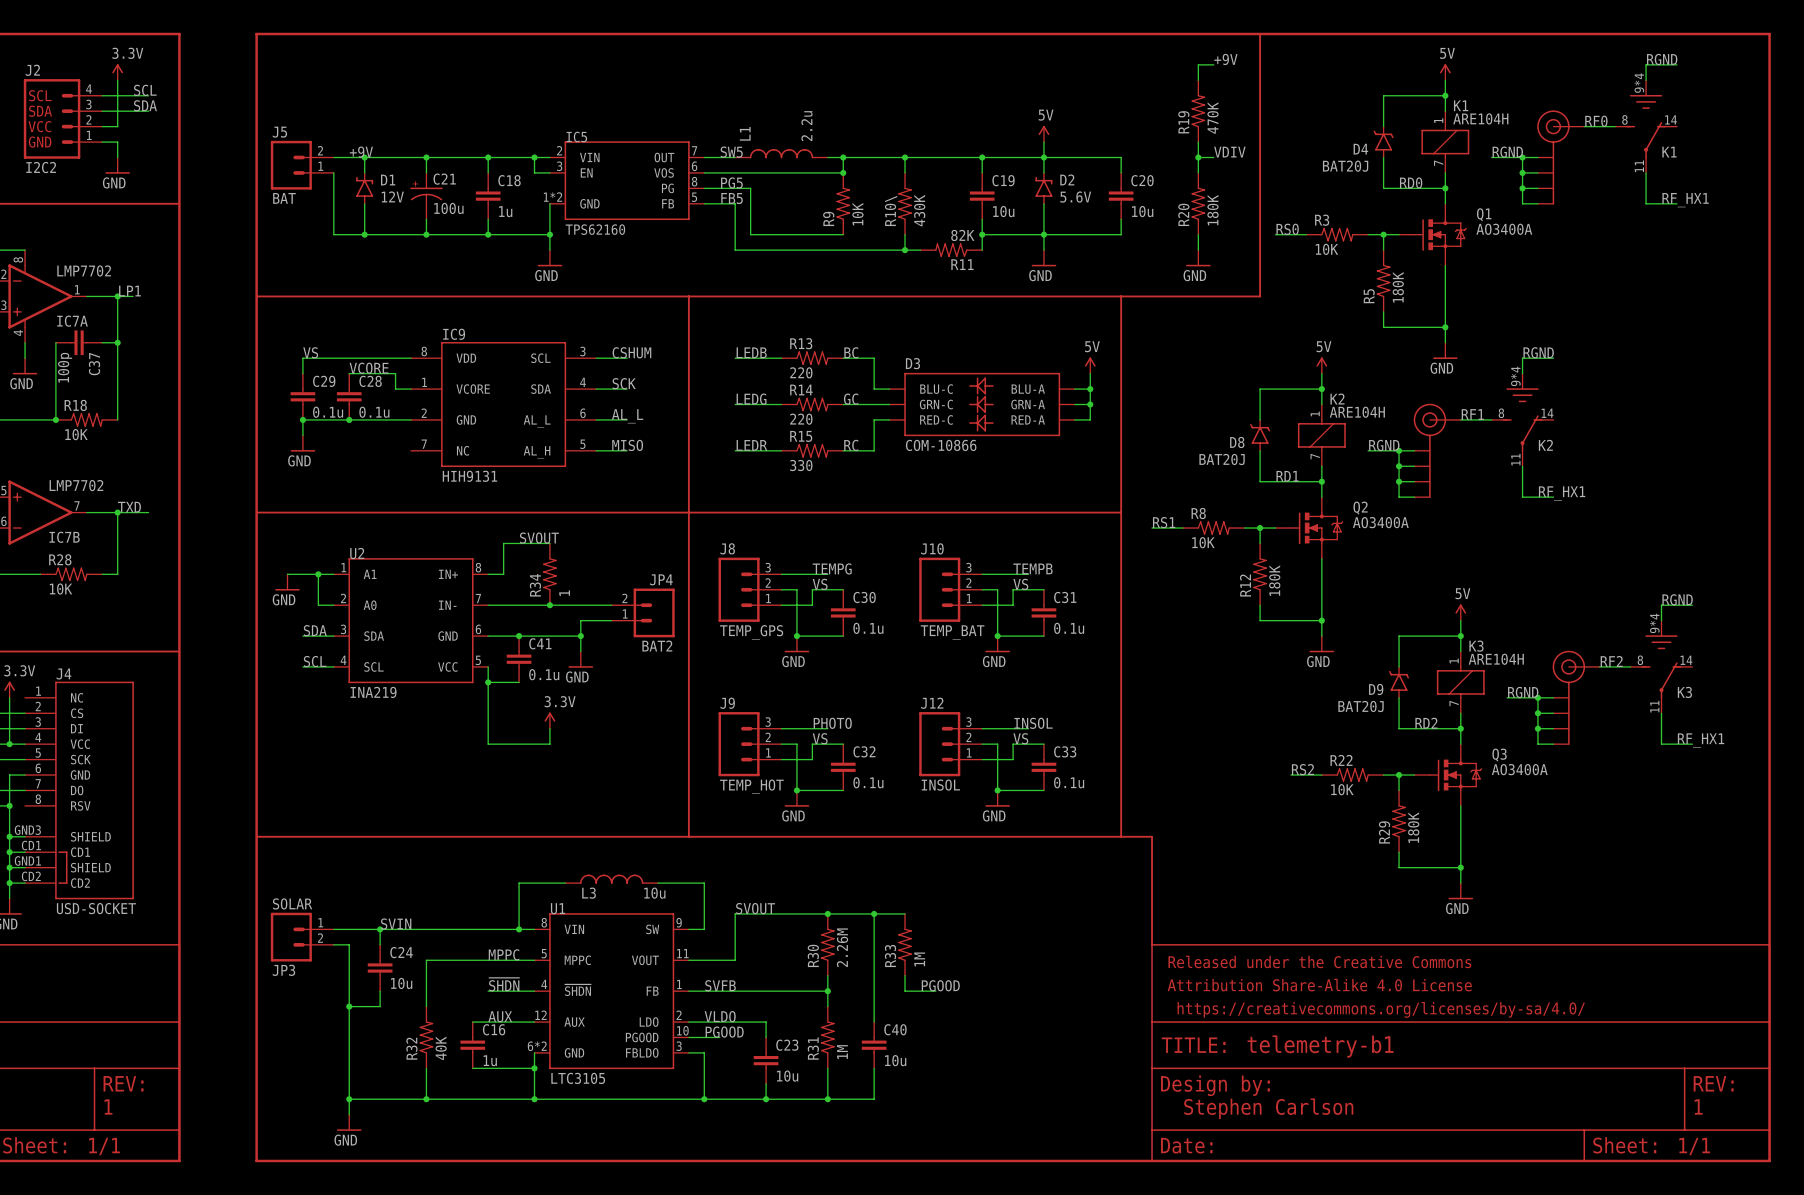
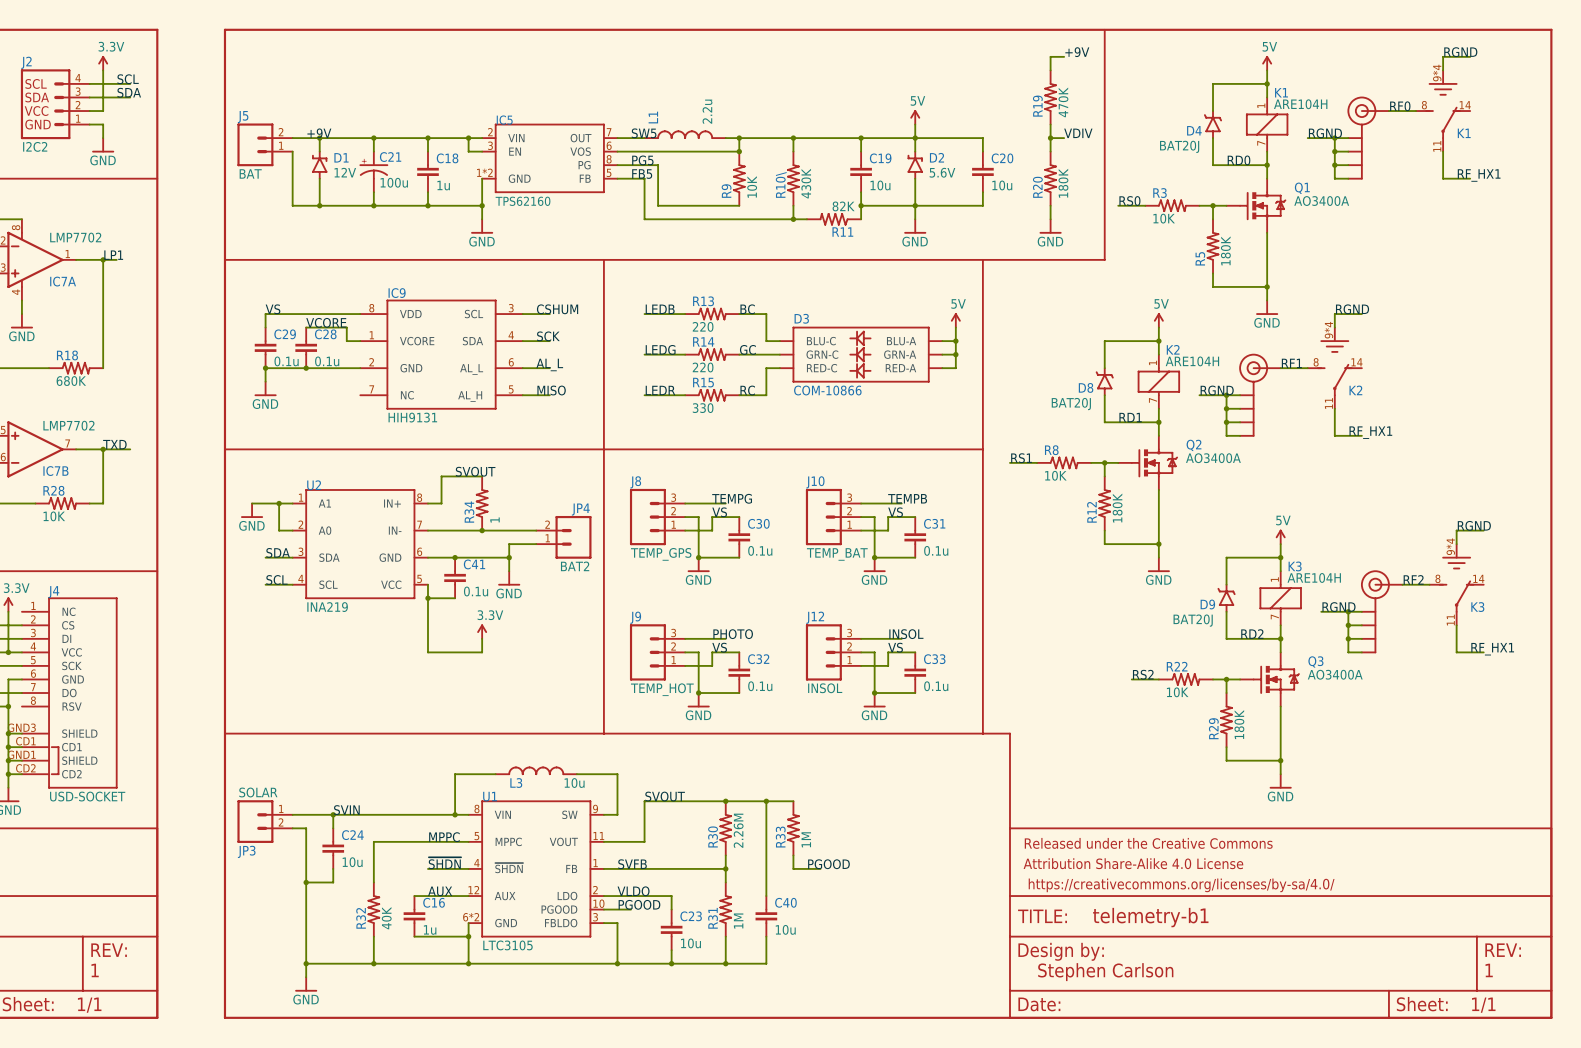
wire: (55, 342) (55, 419) -> none
C37: 100p (79, 342) -> none
wire: (102, 342) (117, 342) -> none
junction: (117, 342) -> none
junction: (55, 419) -> none
R18 value: 10K (76, 434) -> 680K (71, 381)

